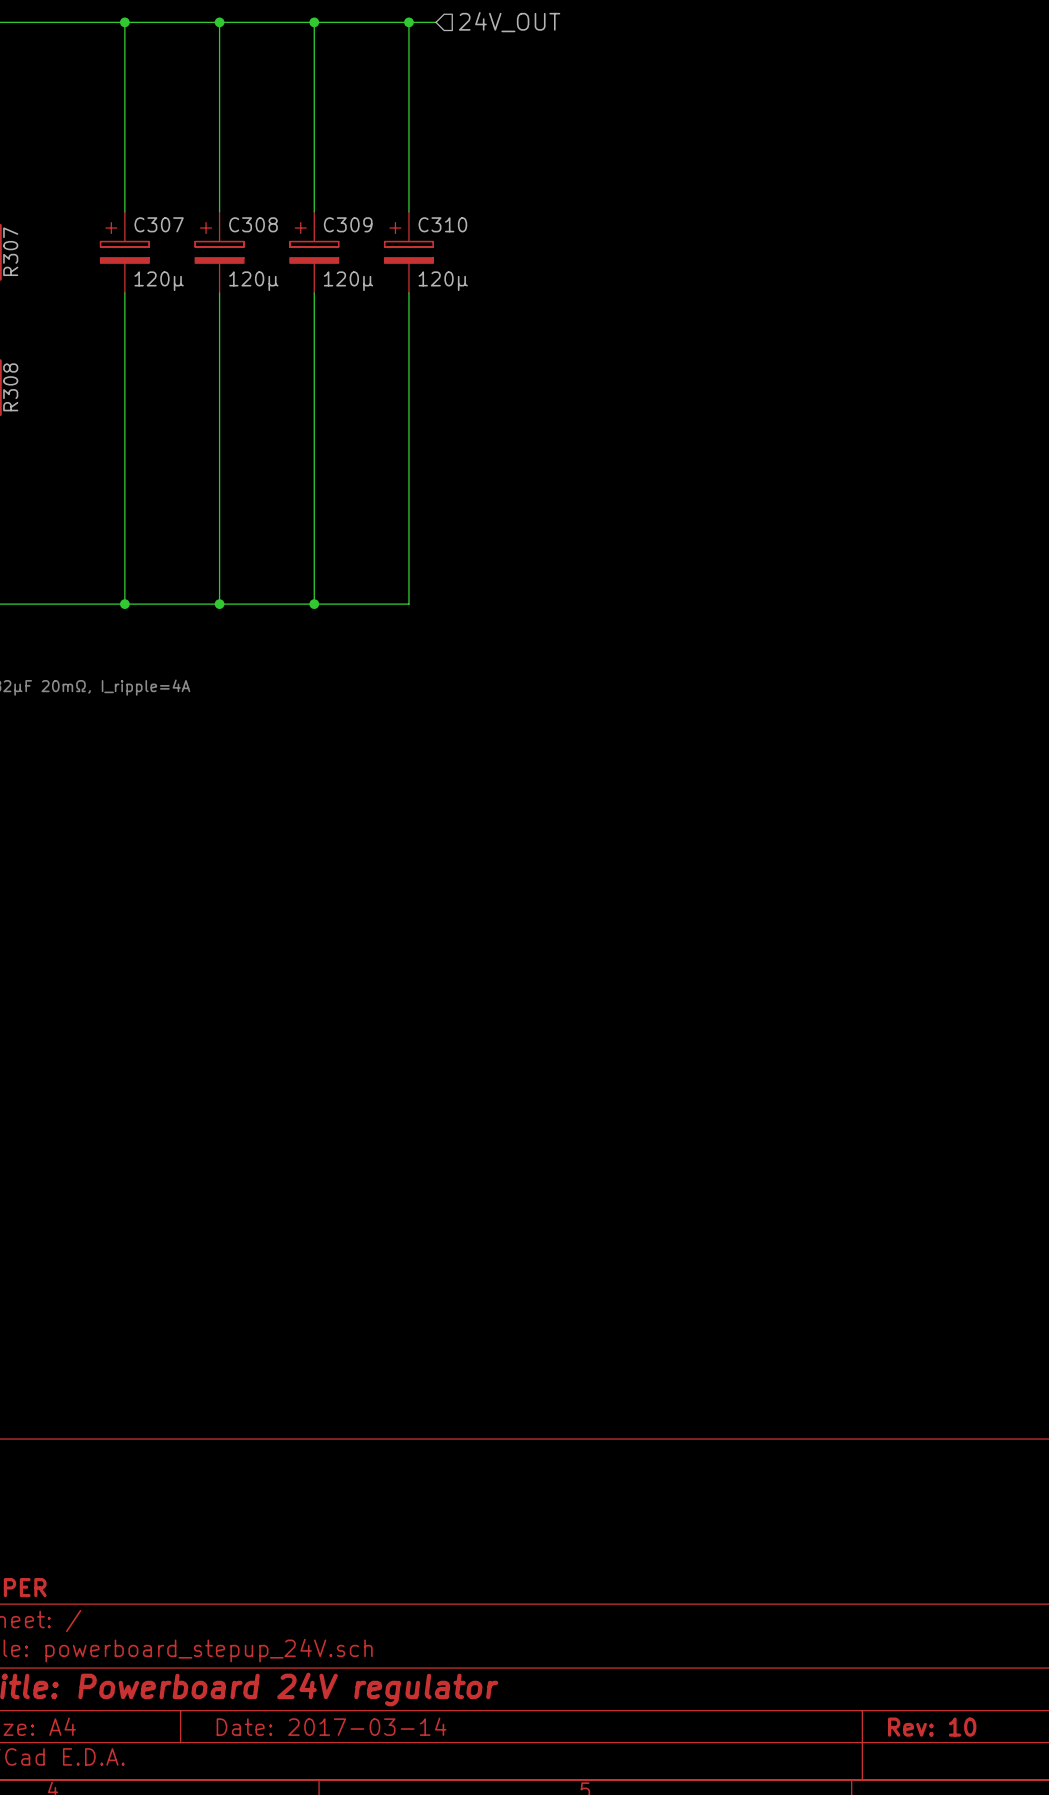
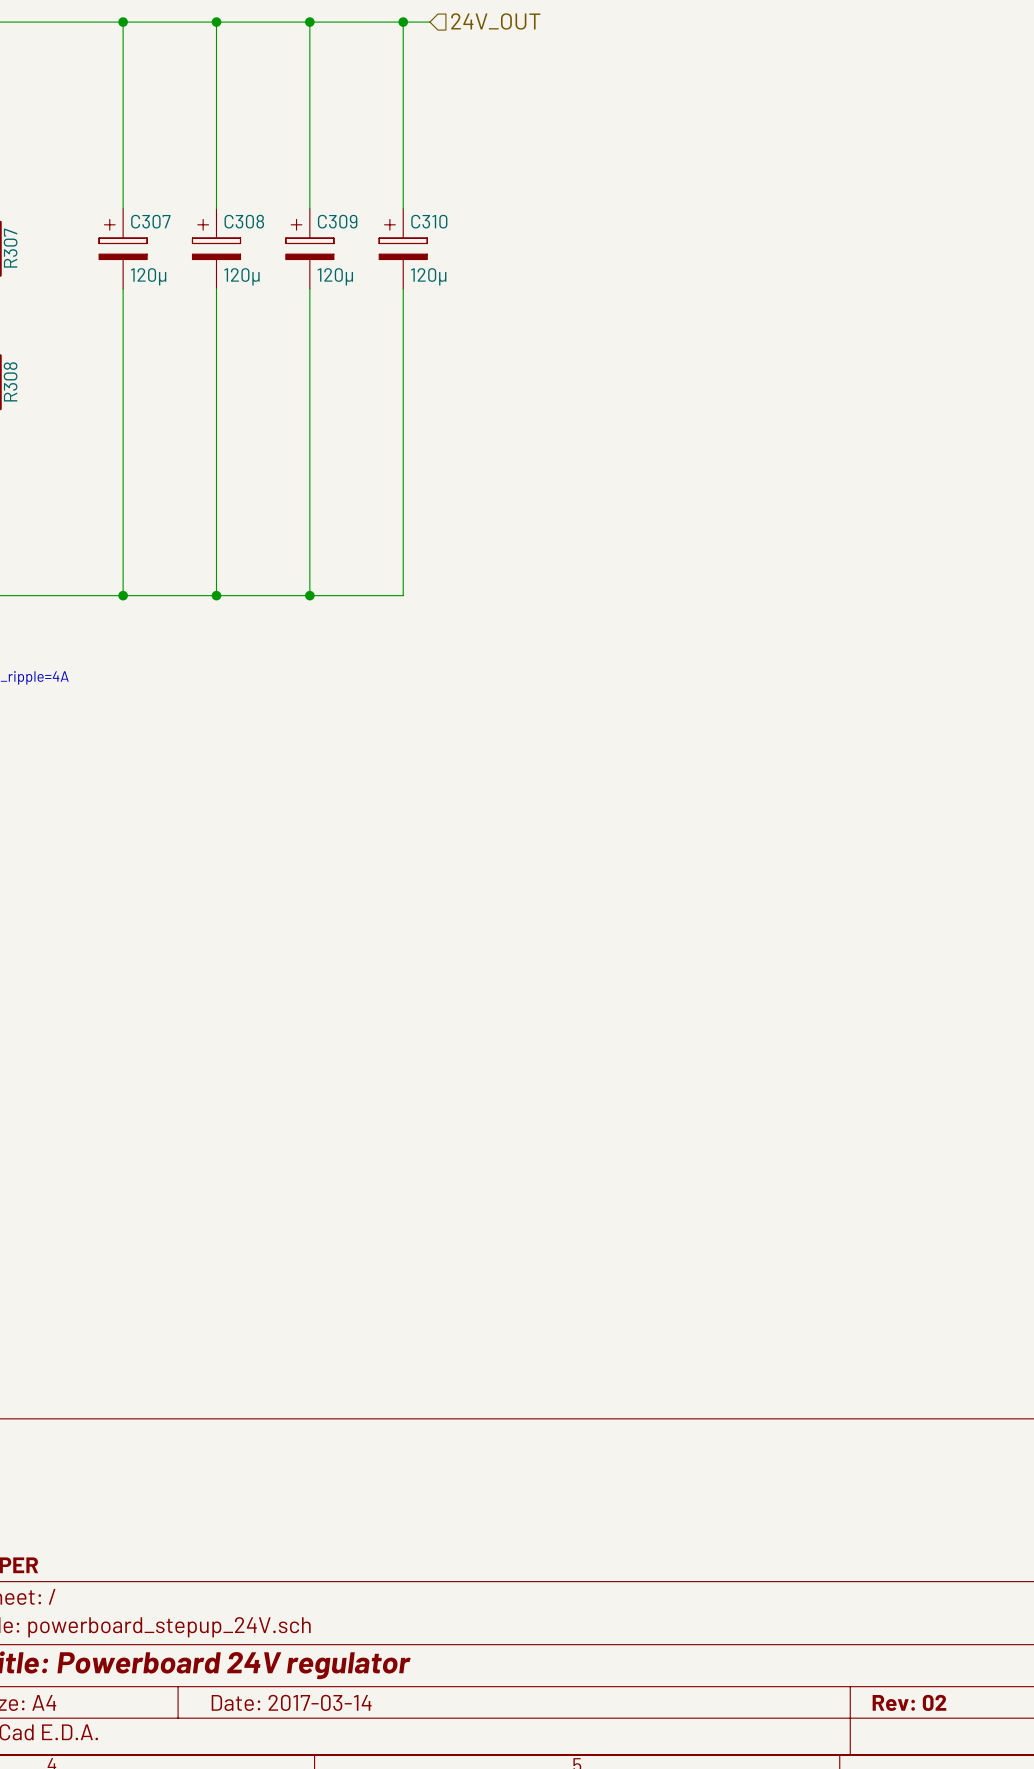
title block: Rev: 10 (932, 1727) -> Rev: 02 (909, 1702)

